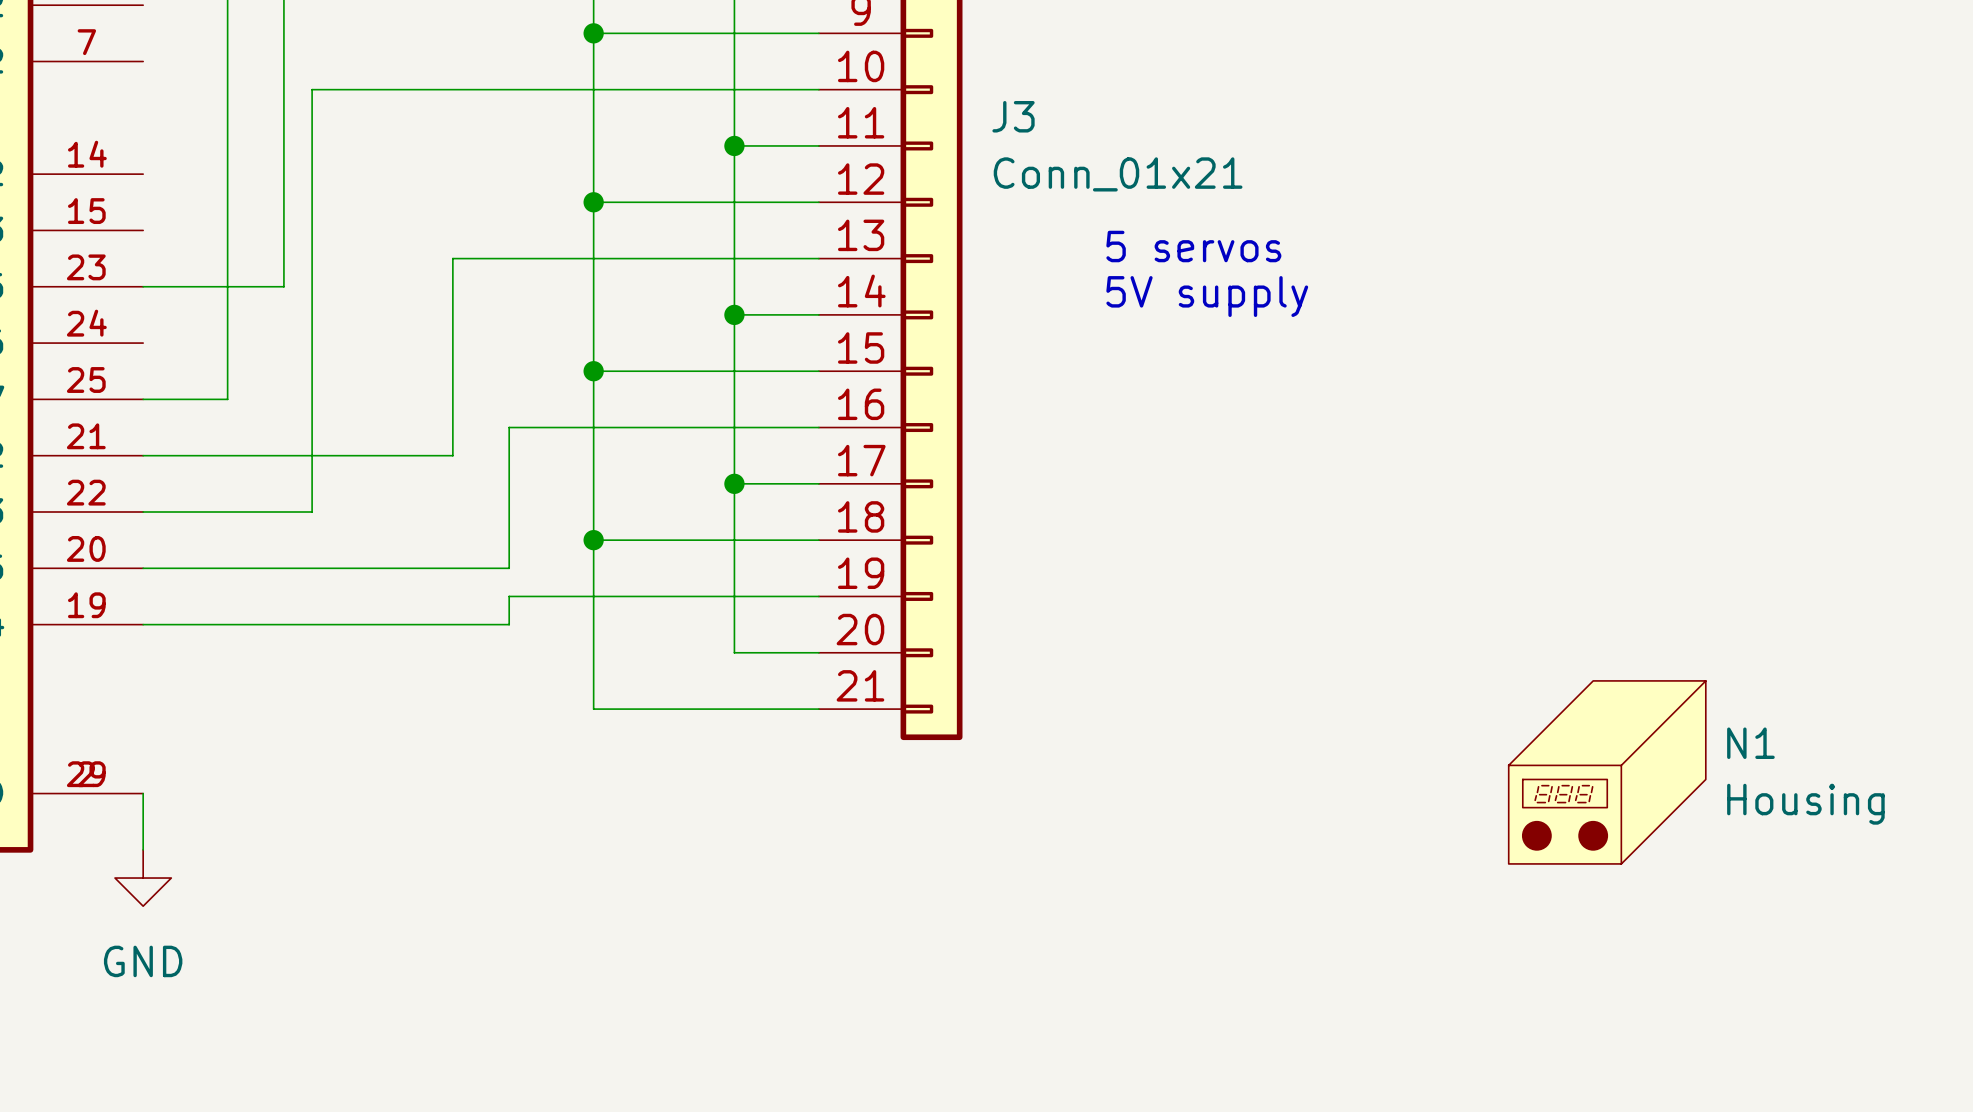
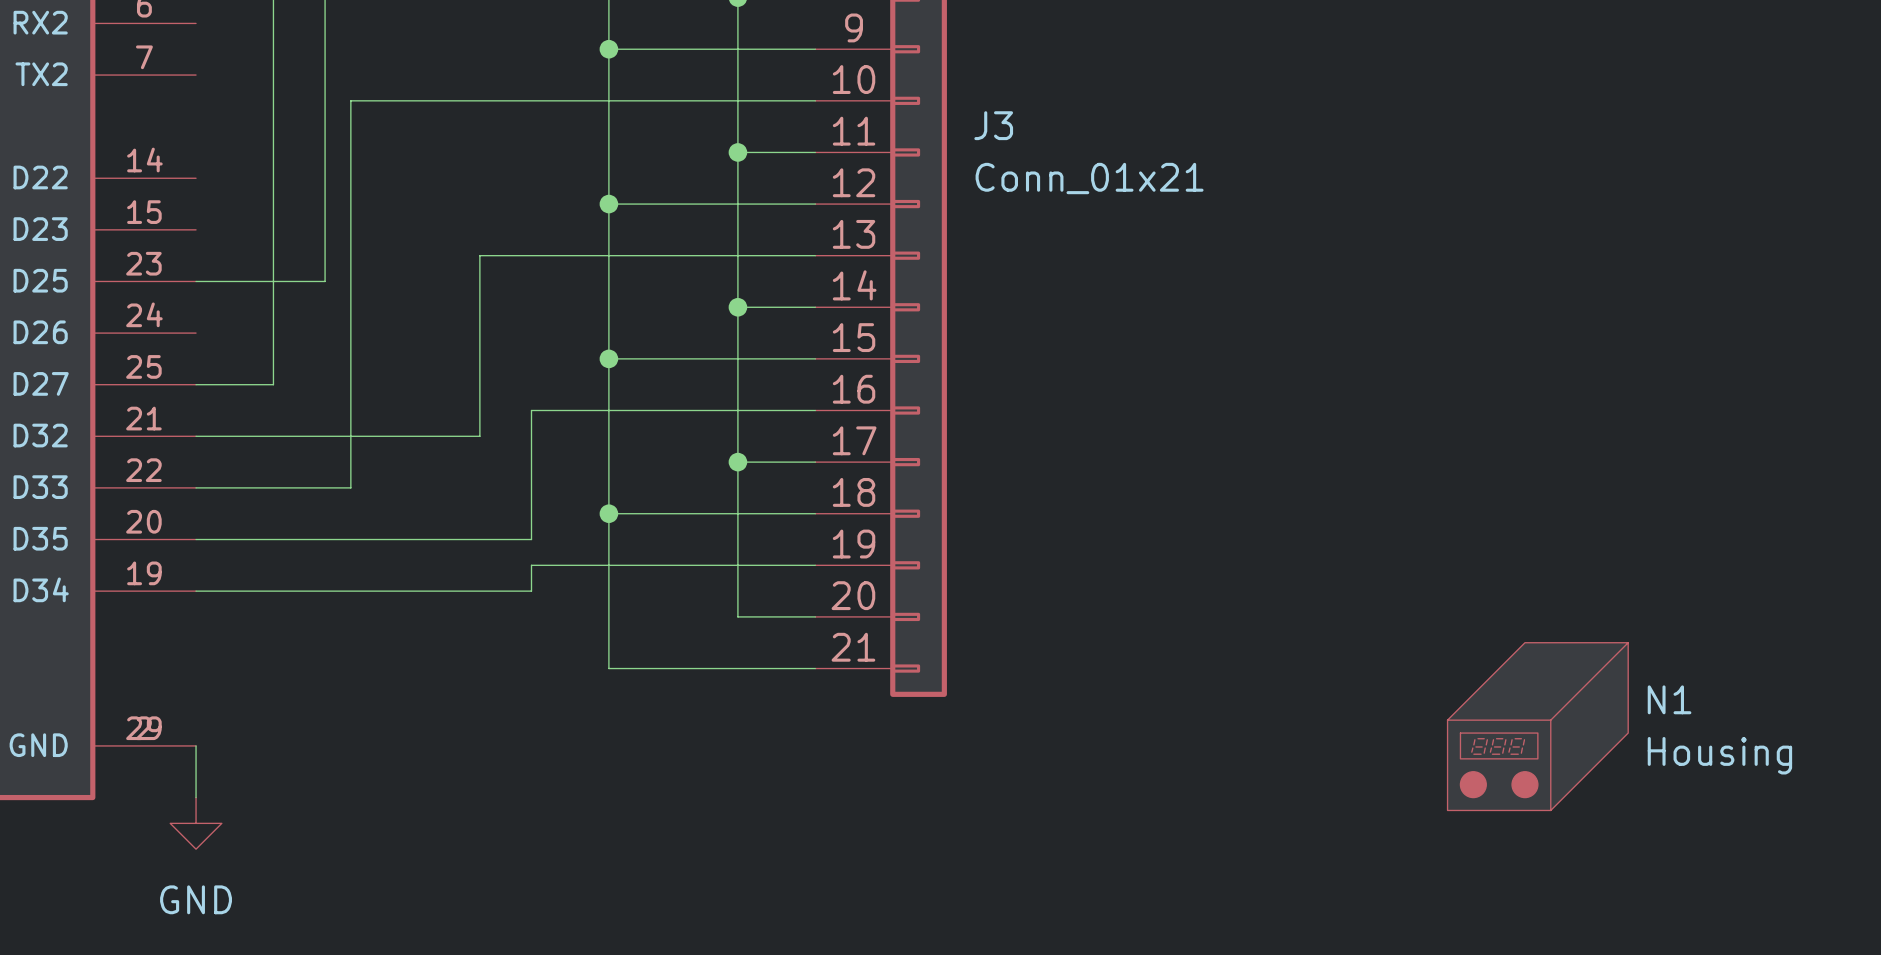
text: 5 servos (1193, 246) -> none
text: 5V supply (1207, 296) -> none

